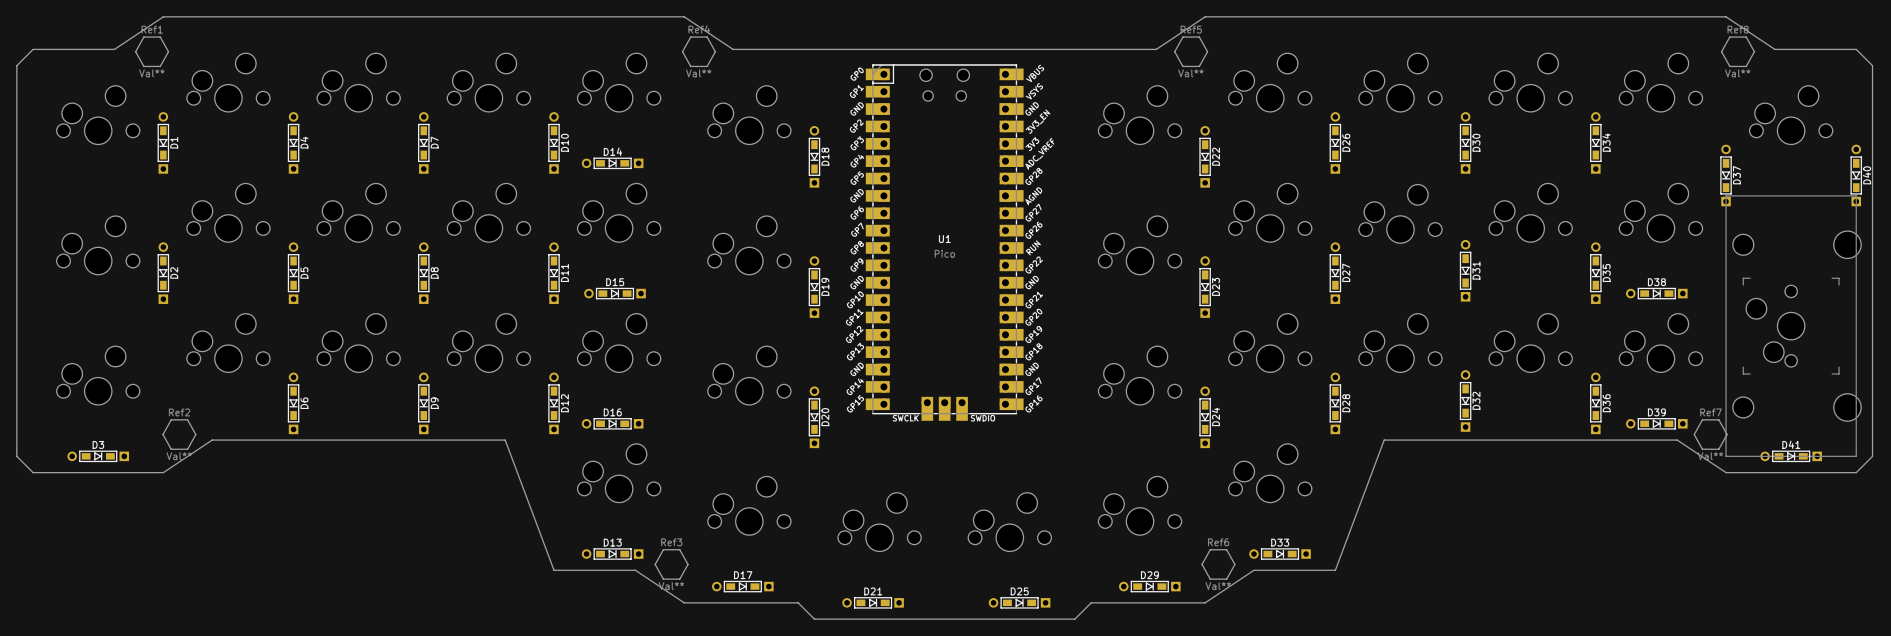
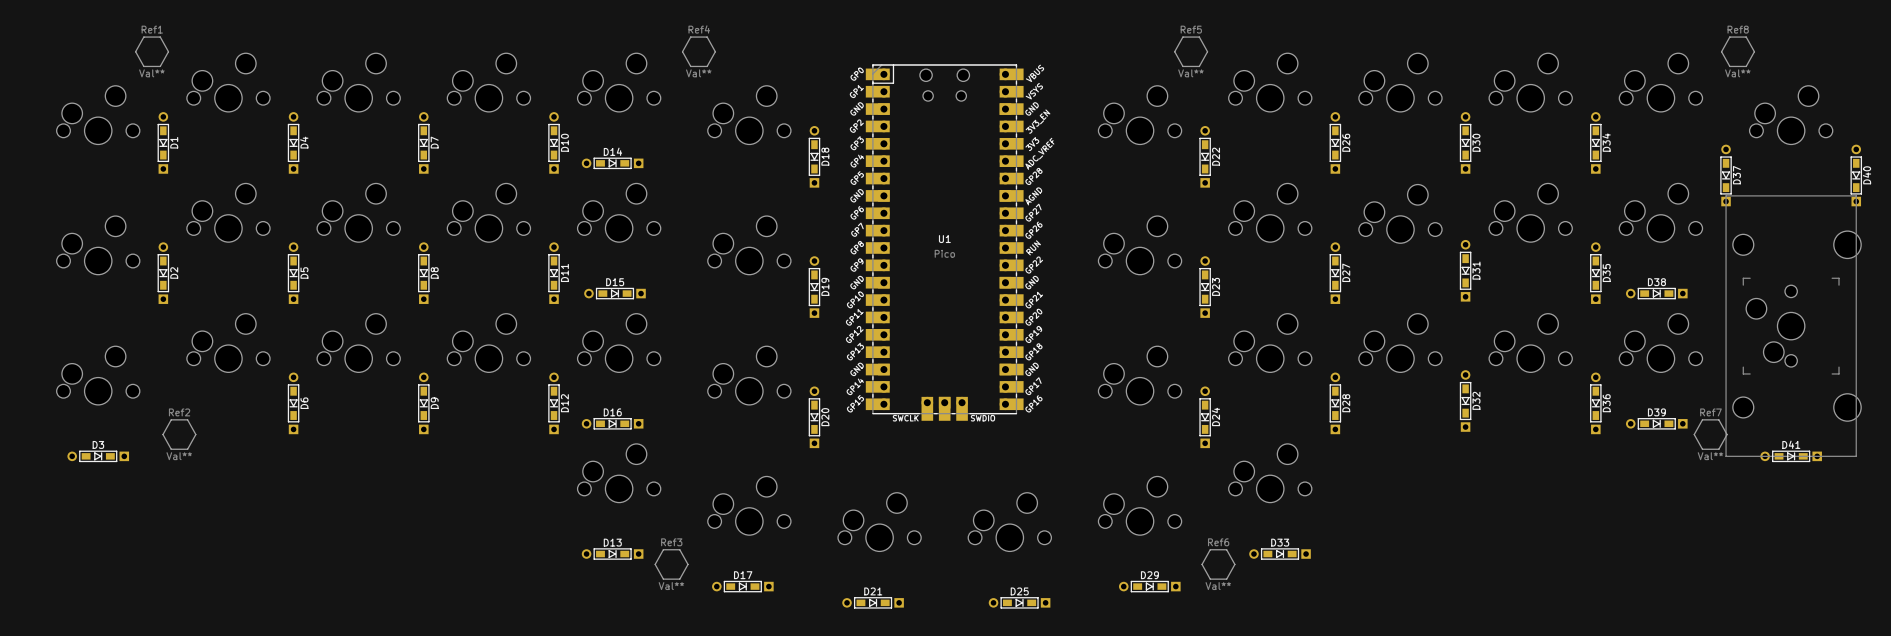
board edge: (163, 16) (684, 16) (733, 49) (1156, 49) (1205, 16) (1726, 16) (1774, 49) (1856, 49) (1872, 65) (1872, 456) (1856, 472) (1726, 472) (1677, 440) (1384, 440) (1335, 570) (1253, 570) (1205, 602) (1091, 602) (1074, 619) (814, 619) (798, 602) (684, 602) (635, 570) (554, 570) (505, 440) (212, 440) (163, 472) (33, 472) (16, 456) (16, 65) (33, 49) (114, 49) (163, 16) -> none

